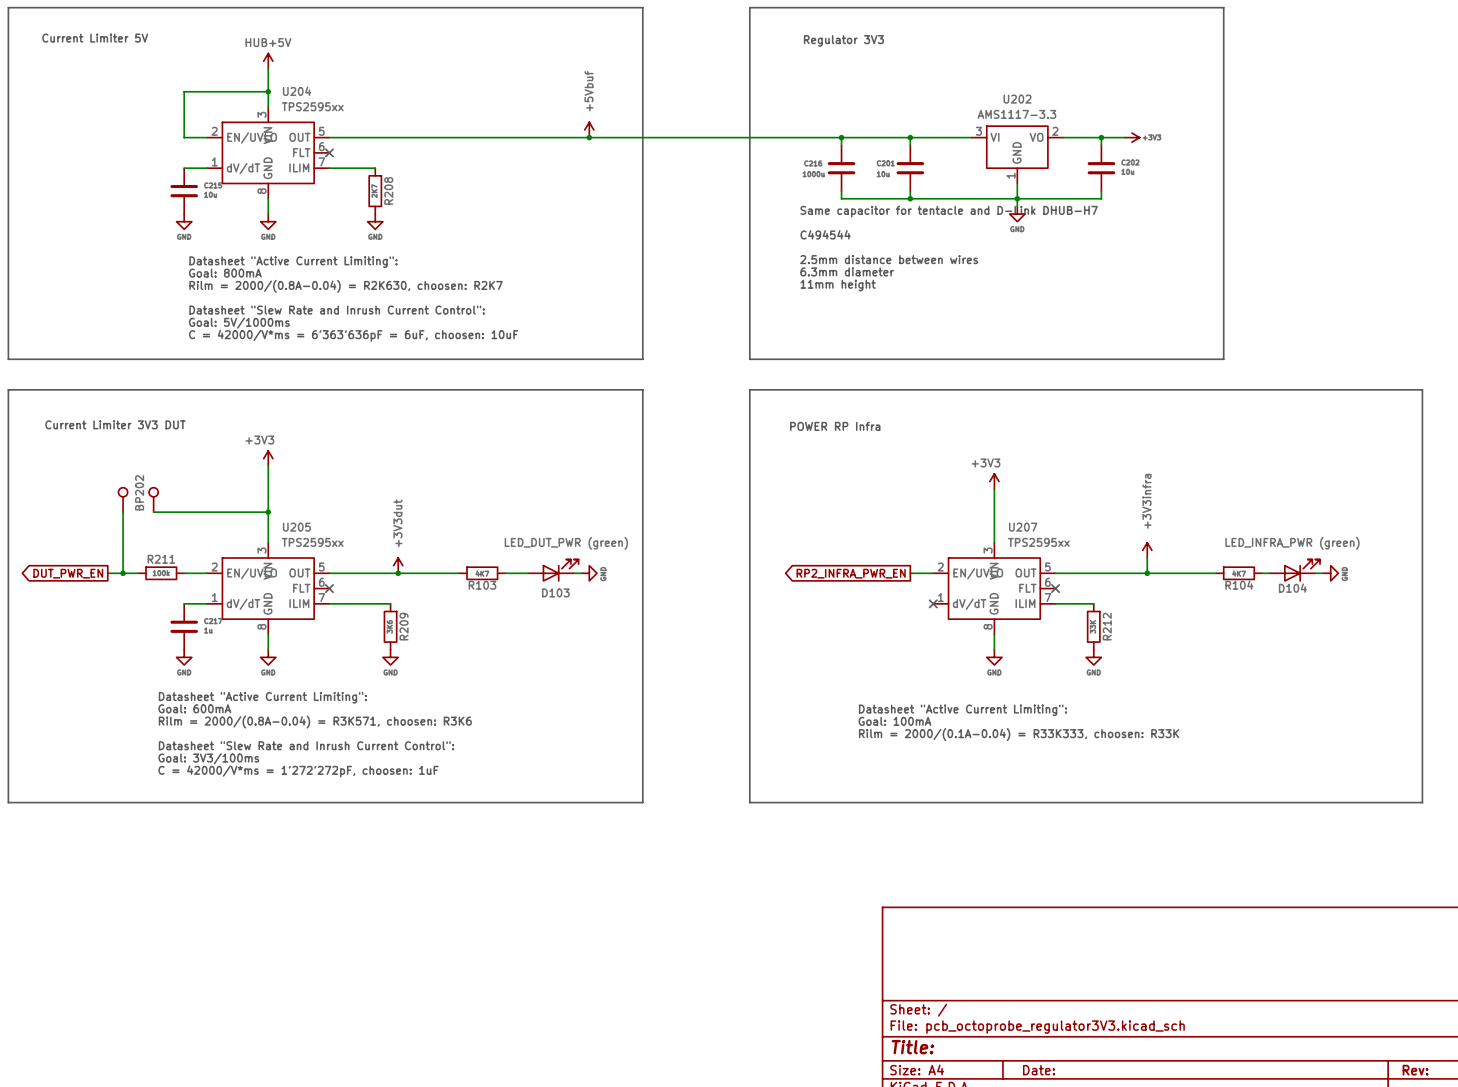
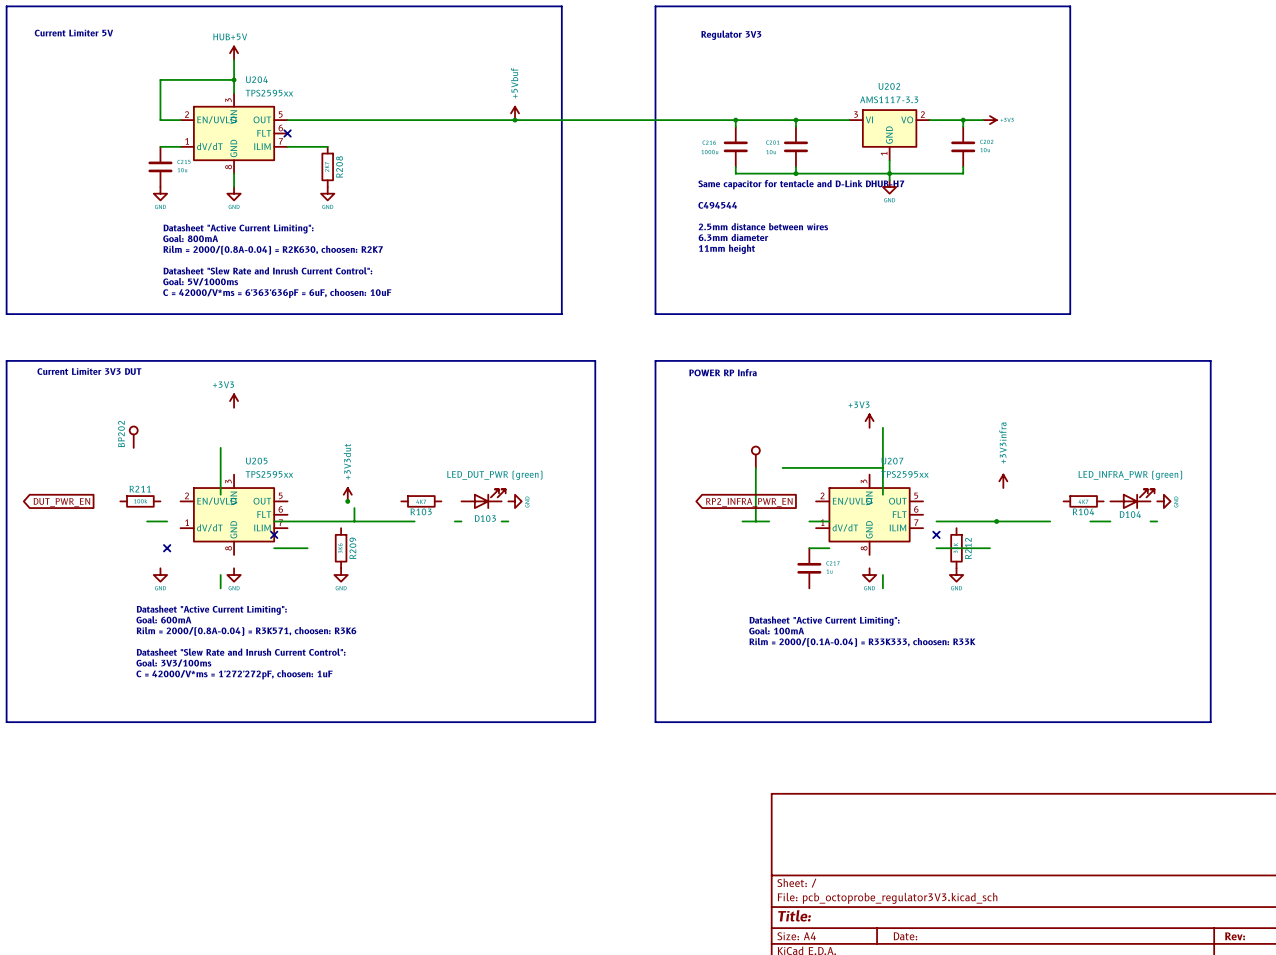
line: (8, 412) (8, 389) (642, 389) (642, 802) (8, 802) -> (6, 360) (595, 360) (595, 722) (6, 722) (6, 702)
line: (749, 412) (749, 389) (1422, 389) (1422, 802) (749, 802) -> (655, 360) (1210, 360) (1210, 722) (655, 722) (655, 702)
wire: (268, 466) (268, 542) -> none
wire: (994, 489) (994, 542) -> none
wire: none -> (882, 427) (882, 494)
part: (123, 499) -> none
wire: (123, 512) (123, 573) -> none
wire: (153, 512) (268, 512) -> none
wire: none -> (220, 447) (220, 494)
junction: (268, 512) -> none
part: none -> (755, 457)
wire: none -> (755, 467) (755, 521)
wire: none -> (782, 467) (882, 467)
wire: (1147, 558) (1147, 573) -> none
wire: (107, 573) (138, 573) -> none
junction: (123, 573) -> none
wire: (184, 573) (207, 573) -> (147, 521) (167, 521)
wire: (329, 573) (459, 573) -> none
wire: (505, 573) (528, 573) -> none
wire: (574, 573) (581, 573) -> (501, 521) (508, 521)
wire: (910, 573) (933, 573) -> (809, 521) (829, 521)
wire: (1055, 573) (1216, 573) -> none
junction position: (1147, 573) -> (996, 521)
wire: (1261, 573) (1269, 573) -> none
wire: (1315, 573) (1323, 573) -> (1150, 521) (1157, 521)
wire: none -> (354, 508) (354, 521)
no-connect mark position: (329, 588) -> (274, 534)
no-connect mark position: (1055, 588) -> (936, 534)
wire: none -> (274, 521) (414, 521)
wire: none -> (454, 521) (461, 521)
wire: none -> (742, 521) (769, 521)
wire: none -> (936, 521) (1050, 521)
wire: none -> (1090, 521) (1110, 521)
wire: (184, 603) (207, 603) -> none
wire: (329, 603) (390, 603) -> none
no-connect mark: (933, 603) -> none
wire: (1055, 603) (1093, 603) -> none
part position: (184, 626) -> (809, 568)
no-connect mark: none -> (167, 548)
wire: none -> (274, 548) (307, 548)
wire: none -> (809, 548) (829, 548)
wire: none -> (936, 548) (989, 548)
wire: (268, 634) (268, 649) -> (220, 574) (220, 588)
wire: (994, 634) (994, 649) -> (882, 574) (882, 588)

